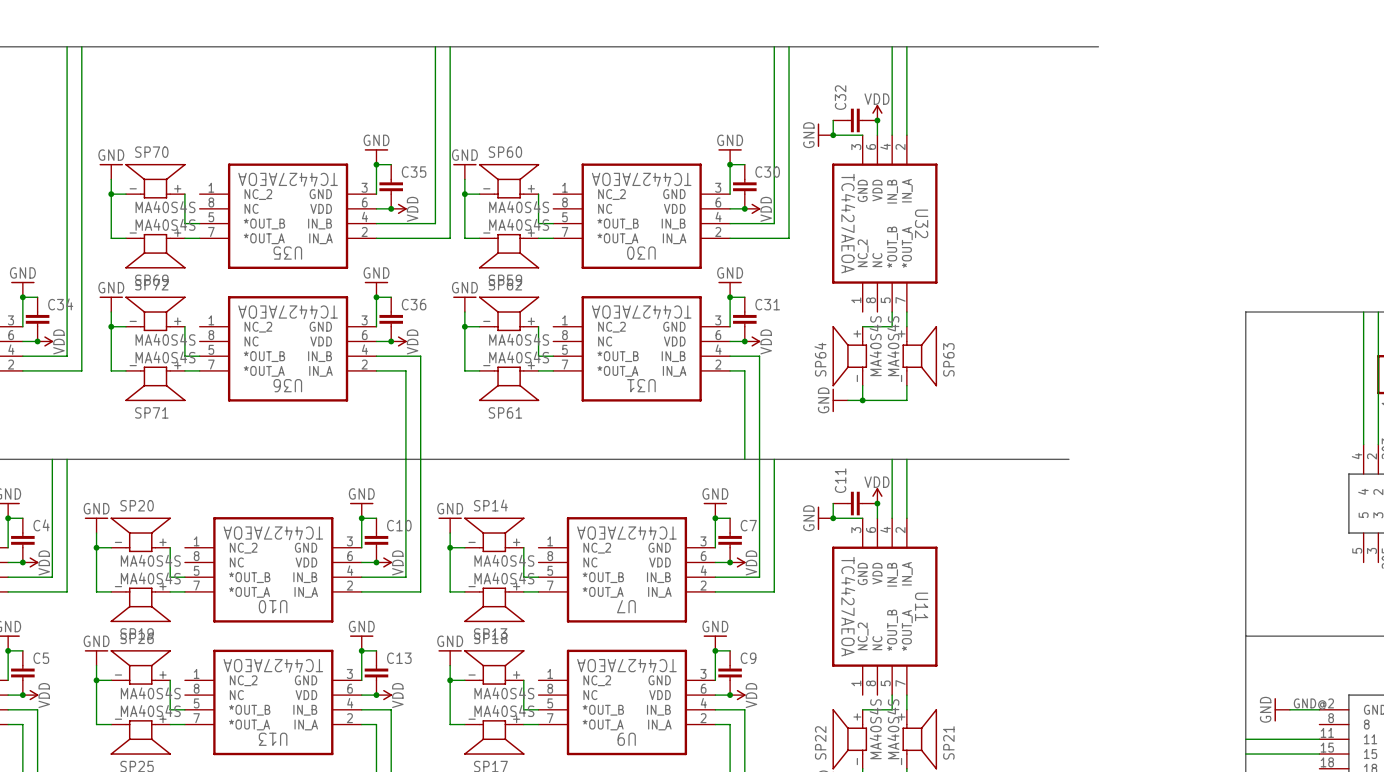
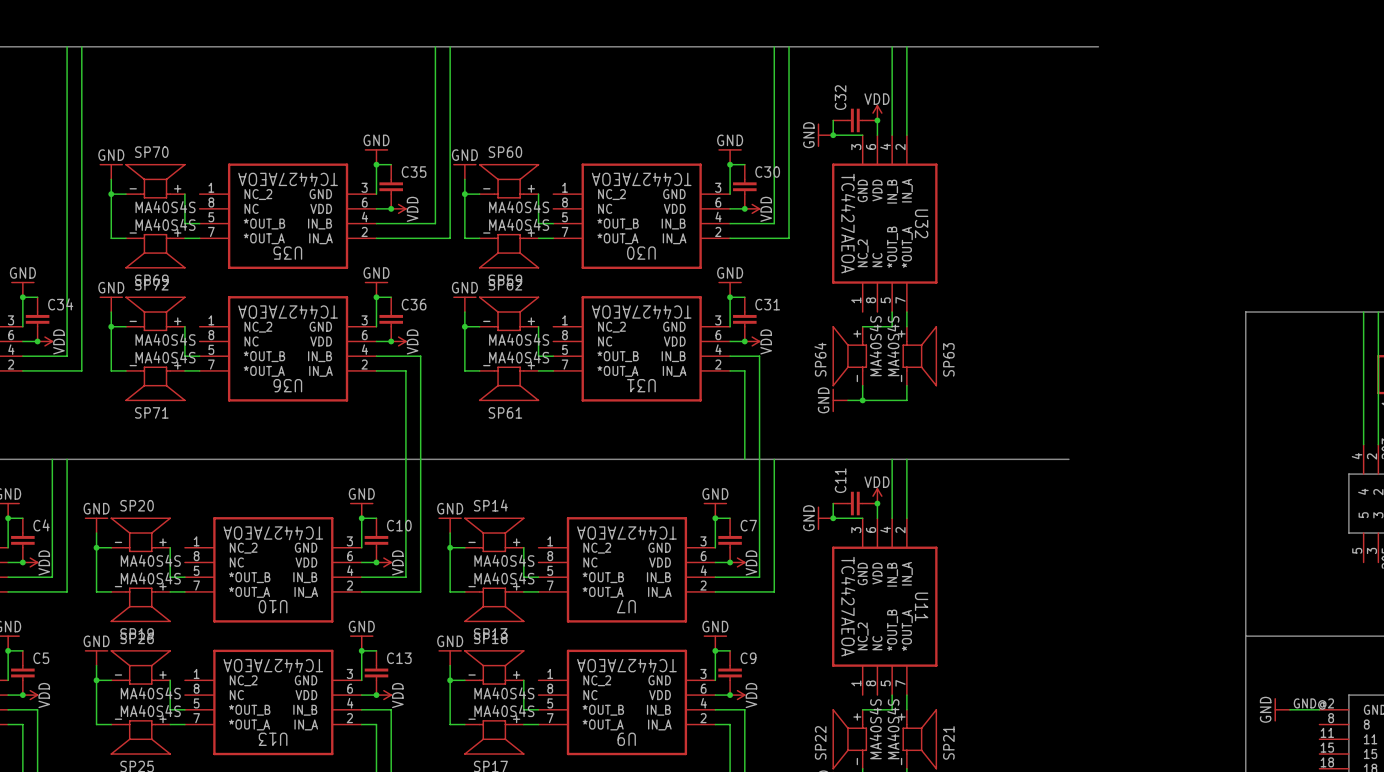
wire: (1245, 739) (1319, 739) -> none
wire: (1245, 754) (1319, 754) -> none

